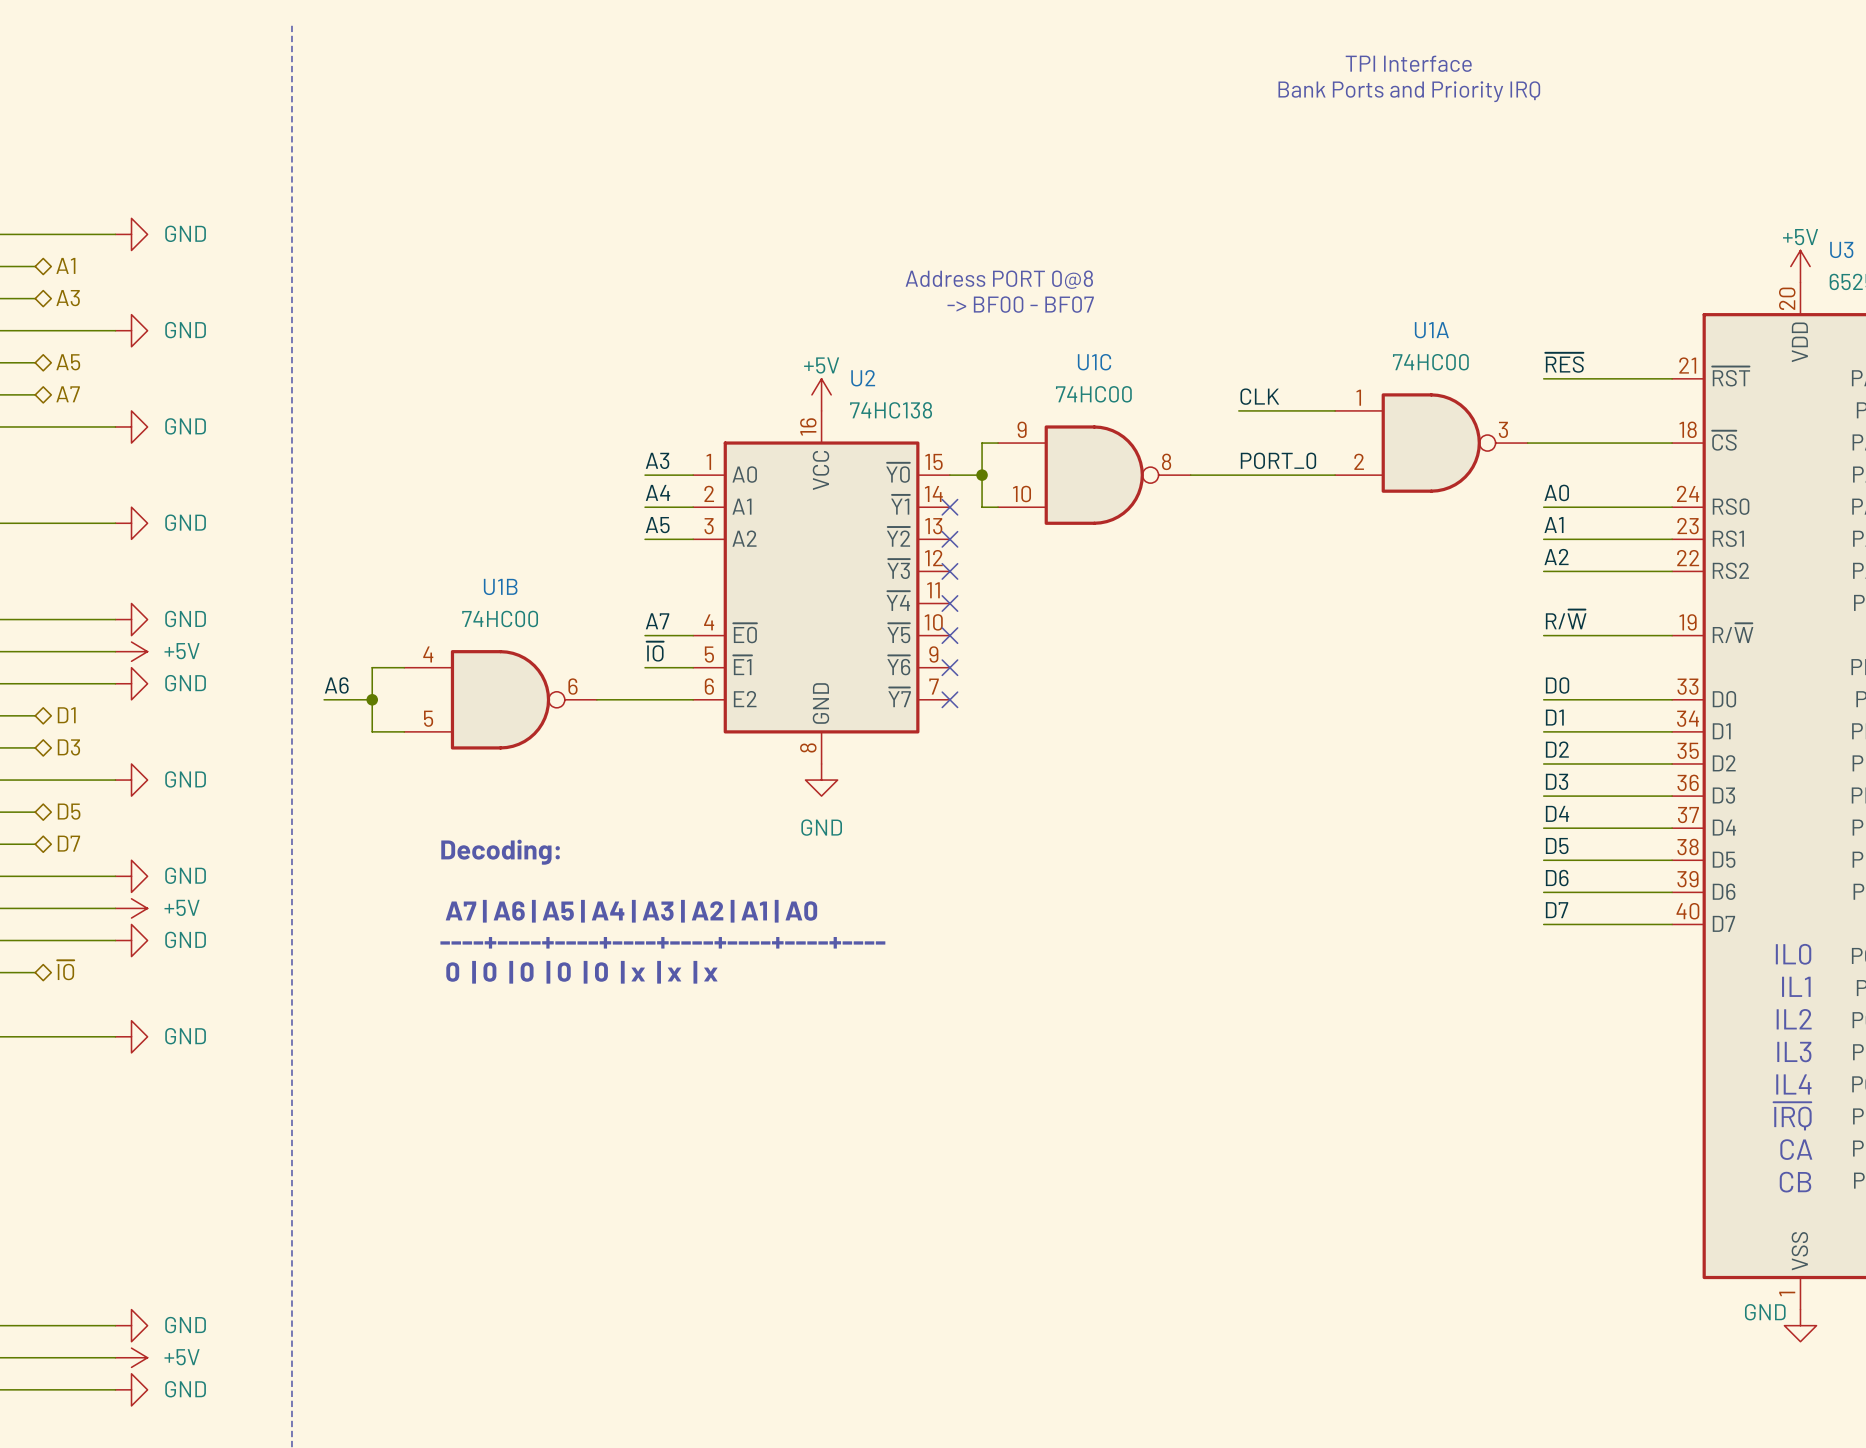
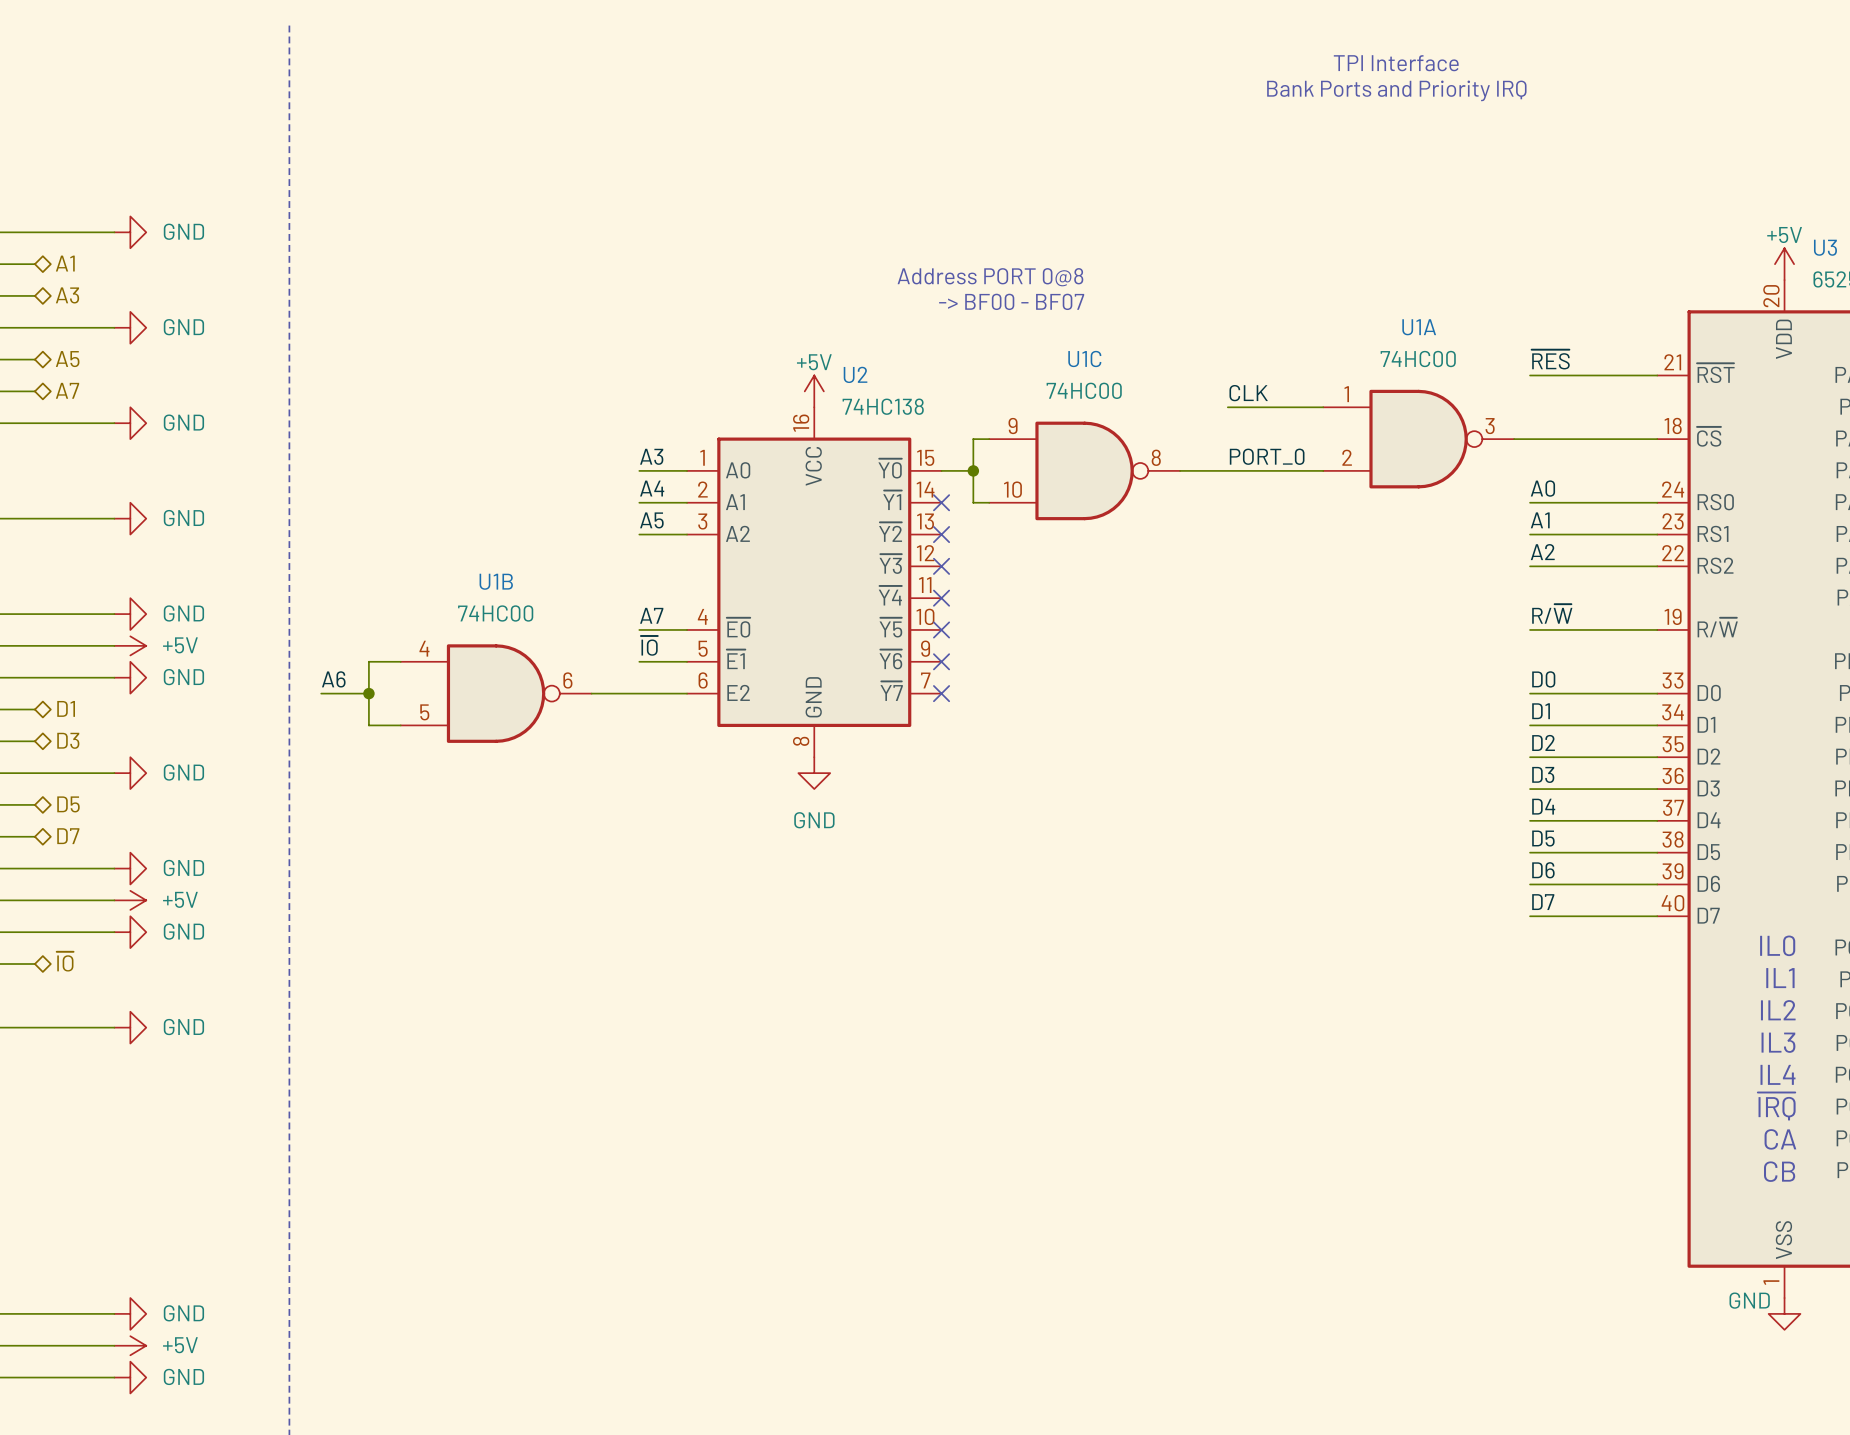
text: Decoding: (500, 852) -> none
text: A7 | A6 | A5 | A4 | A3 | A2 | A1 | A0 (631, 911) -> none
text: ----+----+----+----+----+----+----+---- (662, 942) -> none
text: 0 | 0 | 0 | 0 | 0 | x | x | x (581, 972) -> none

